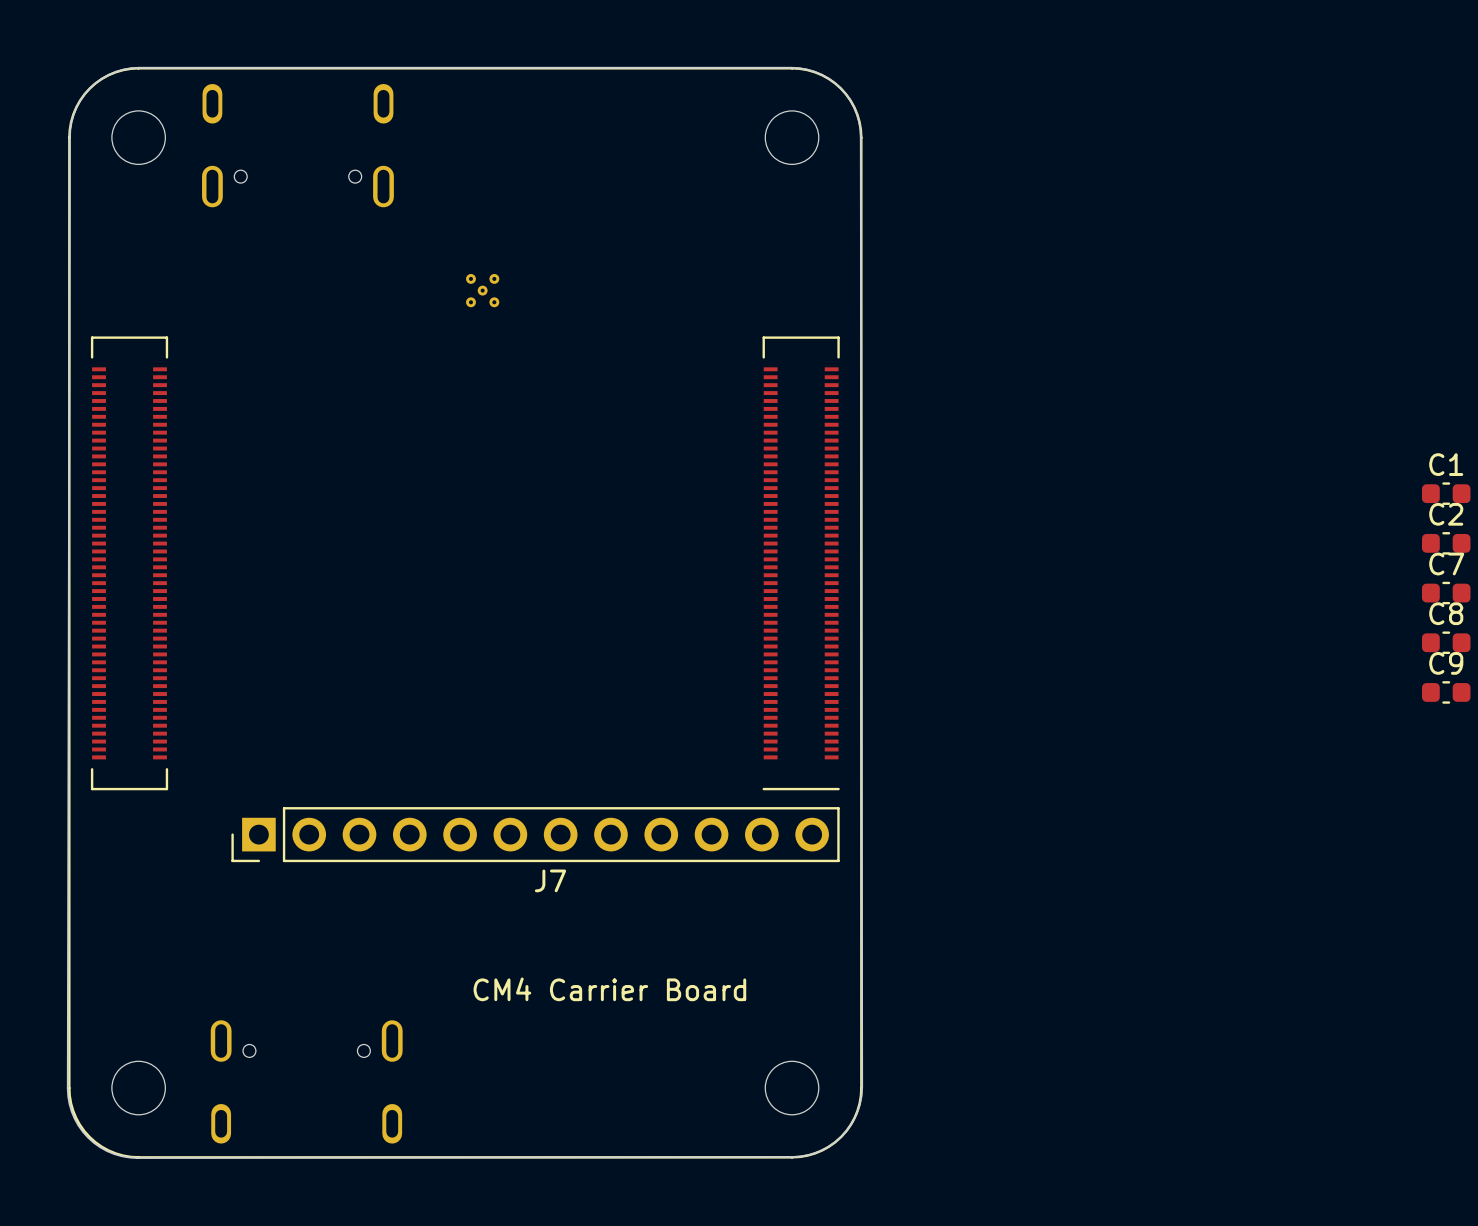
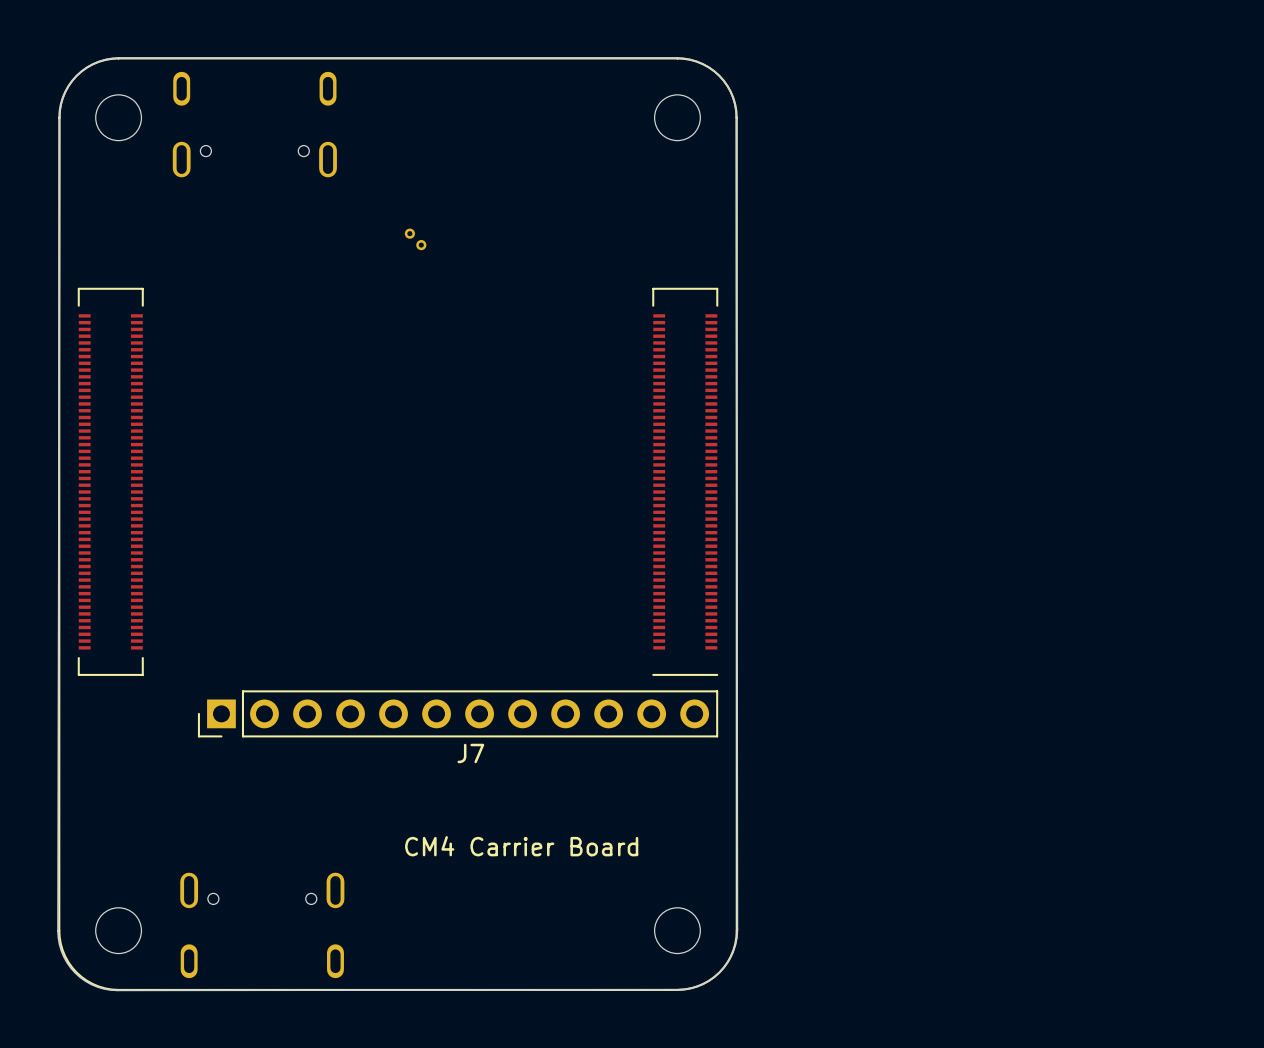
part footprint: [466, 273, 500, 308] -> [404, 228, 427, 251]
C1: (1446, 493) -> none
C2: (1446, 543) -> none
C7: (1446, 593) -> none
C8: (1446, 642) -> none
C9: (1446, 692) -> none

